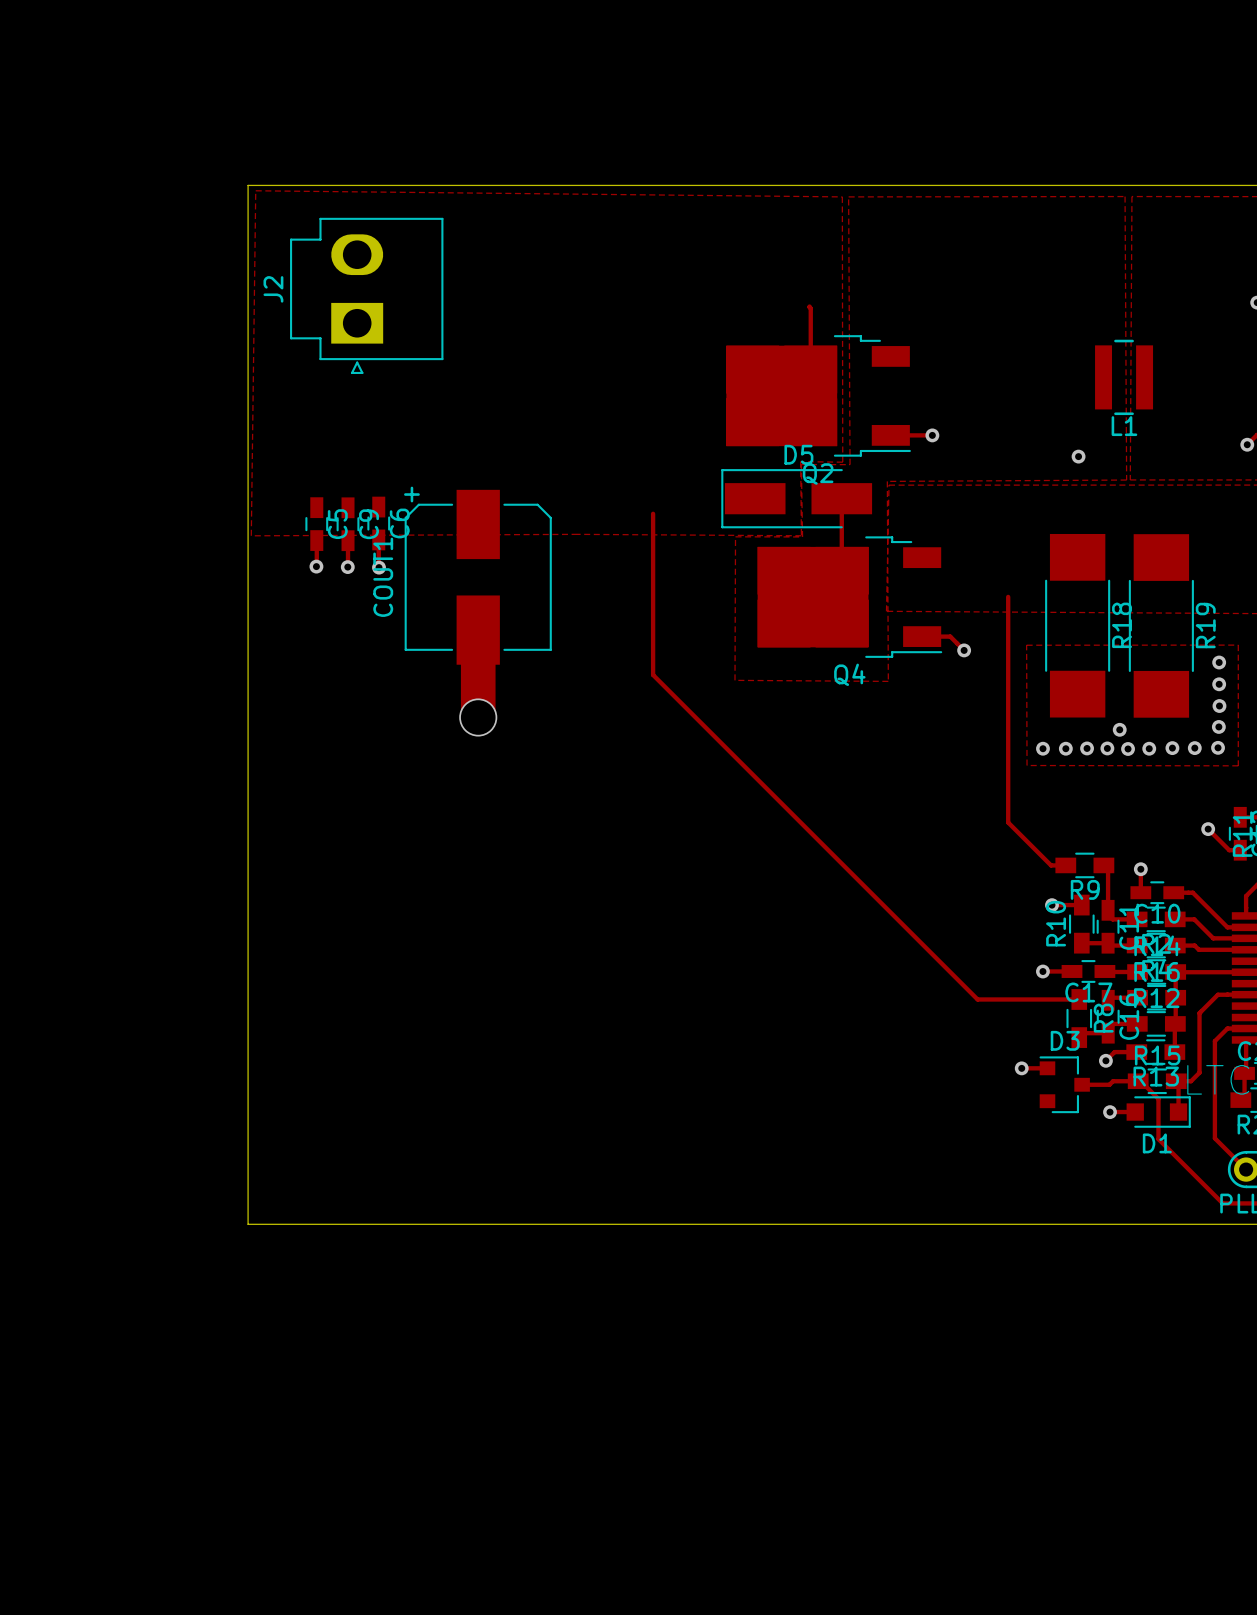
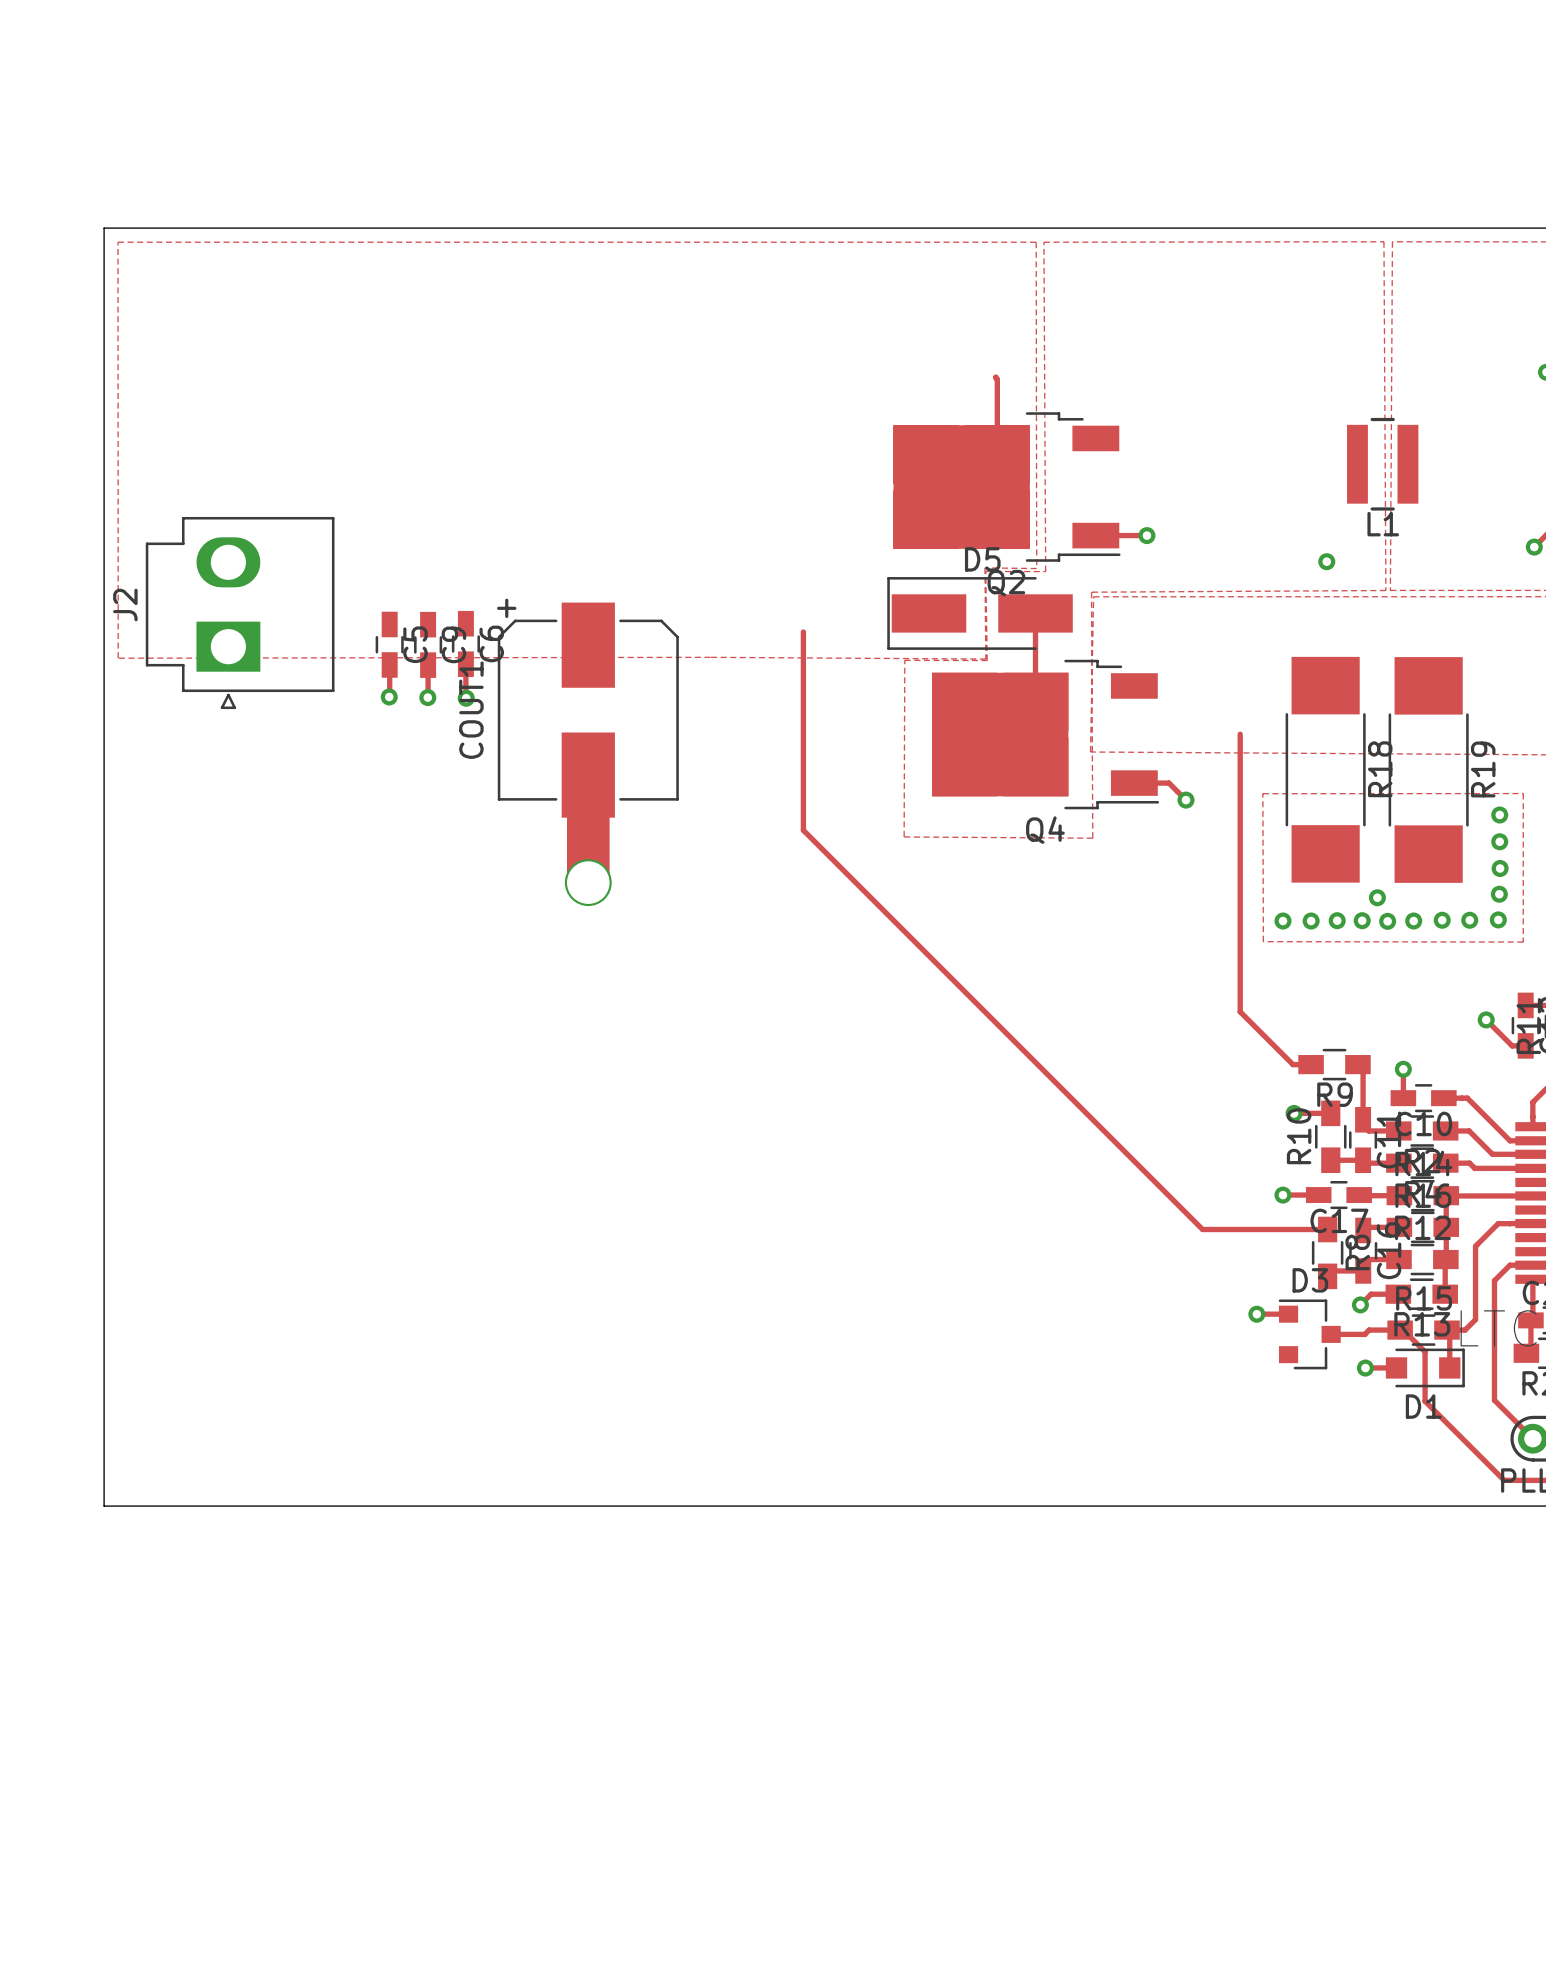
board edge: (248, 185) (248, 1224) -> (305, 228) (104, 228) (104, 1506) (305, 1506)
zone outline: (842, 196) (255, 190) (251, 535) (577, 534) -> (1036, 242) (117, 242) (118, 658) (710, 657)
J2 footprint: [290, 217, 444, 374] -> [145, 516, 335, 710]

